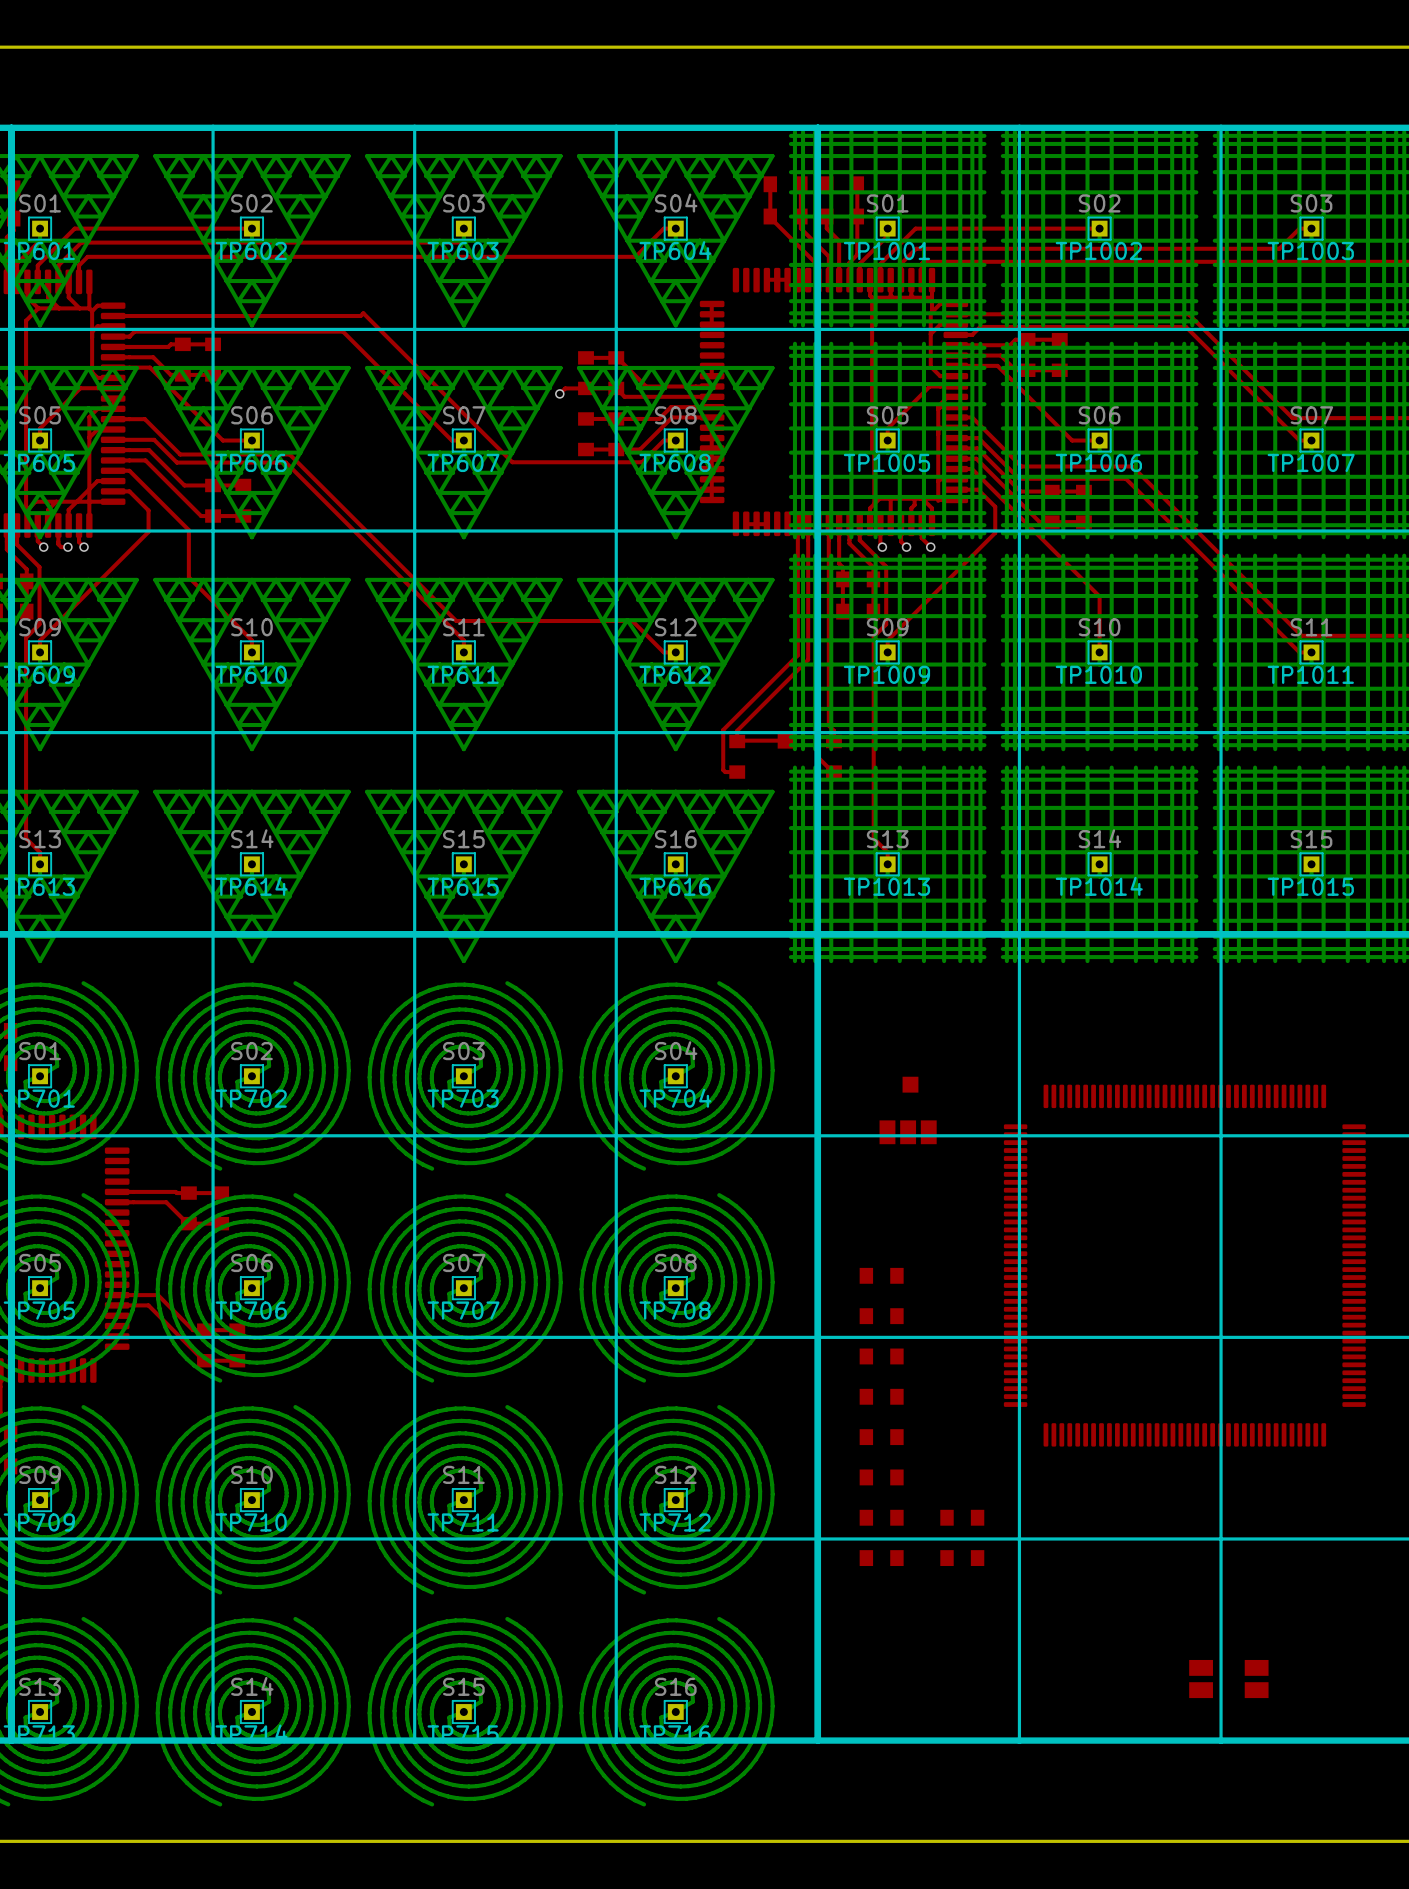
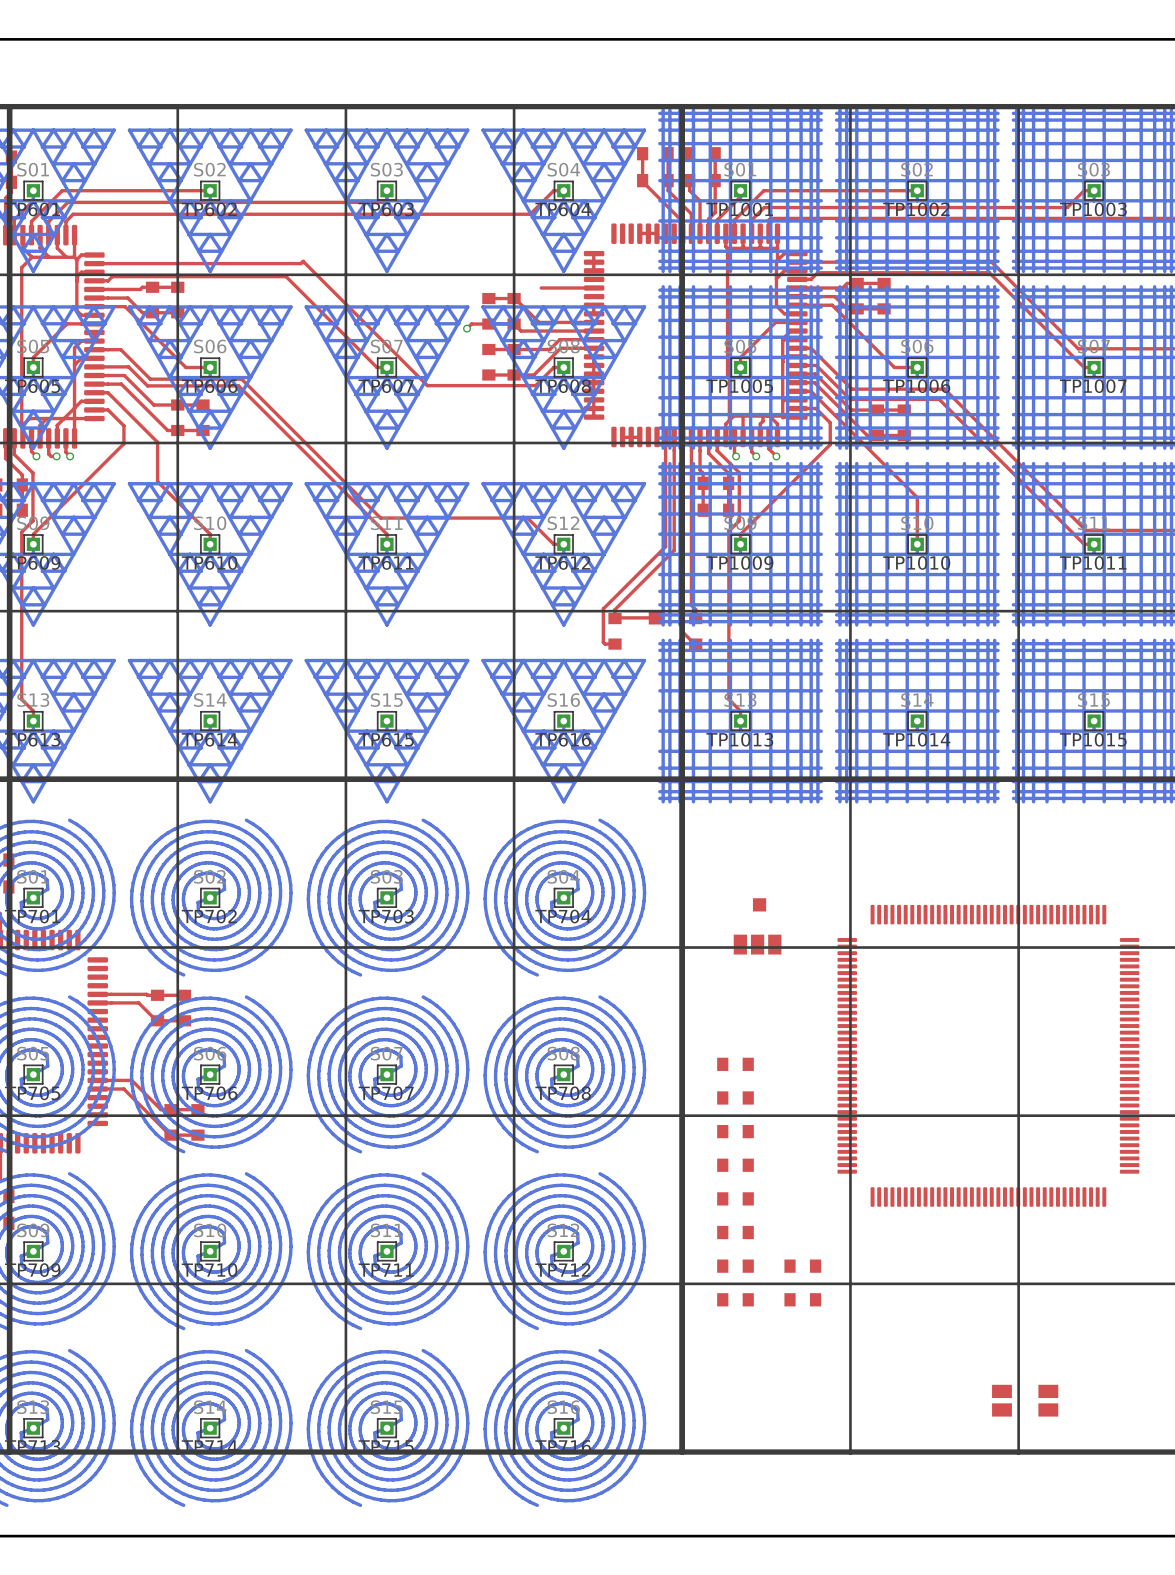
top track: none -> (593, 288) (541, 288)

